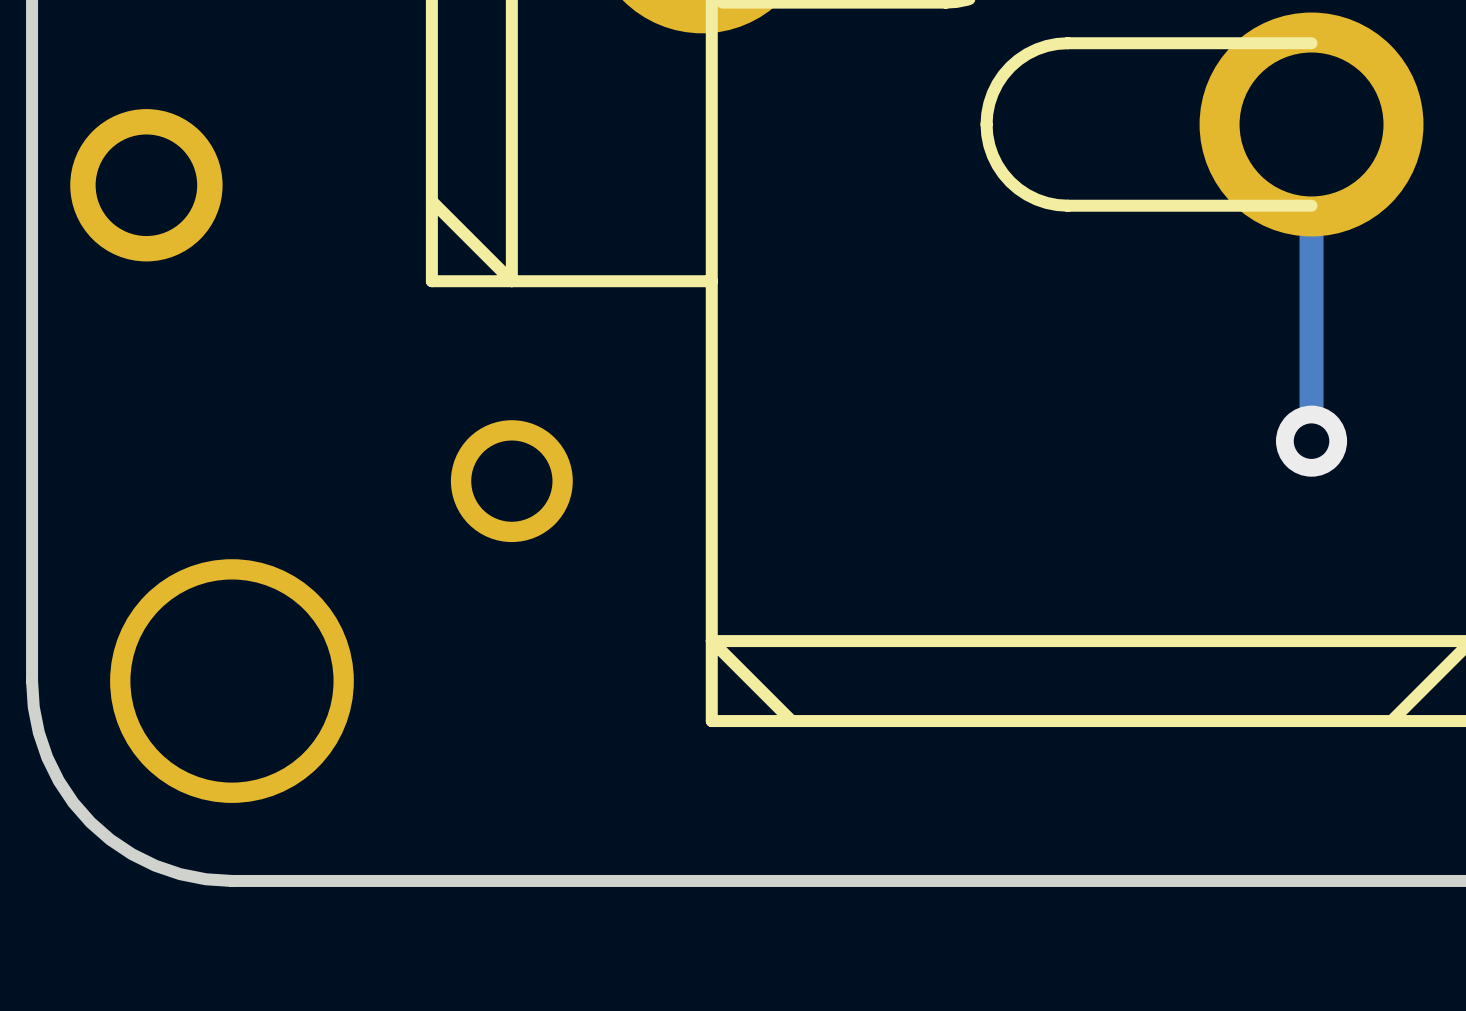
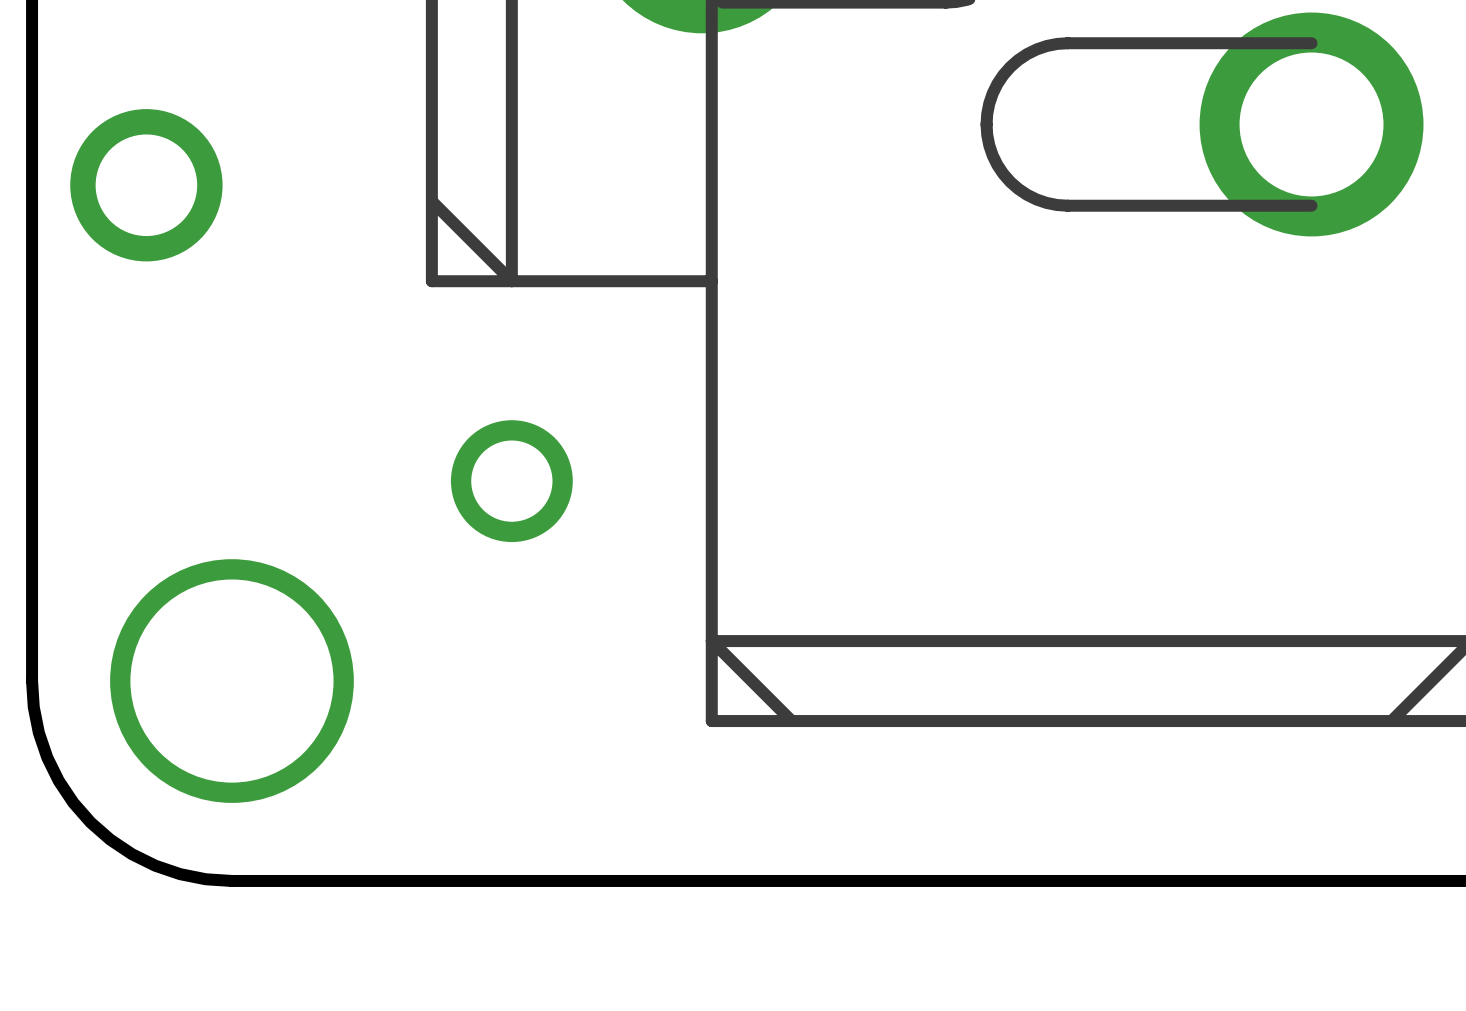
track: (1311, 124) (1311, 441) -> none
via: (1311, 441) -> none

